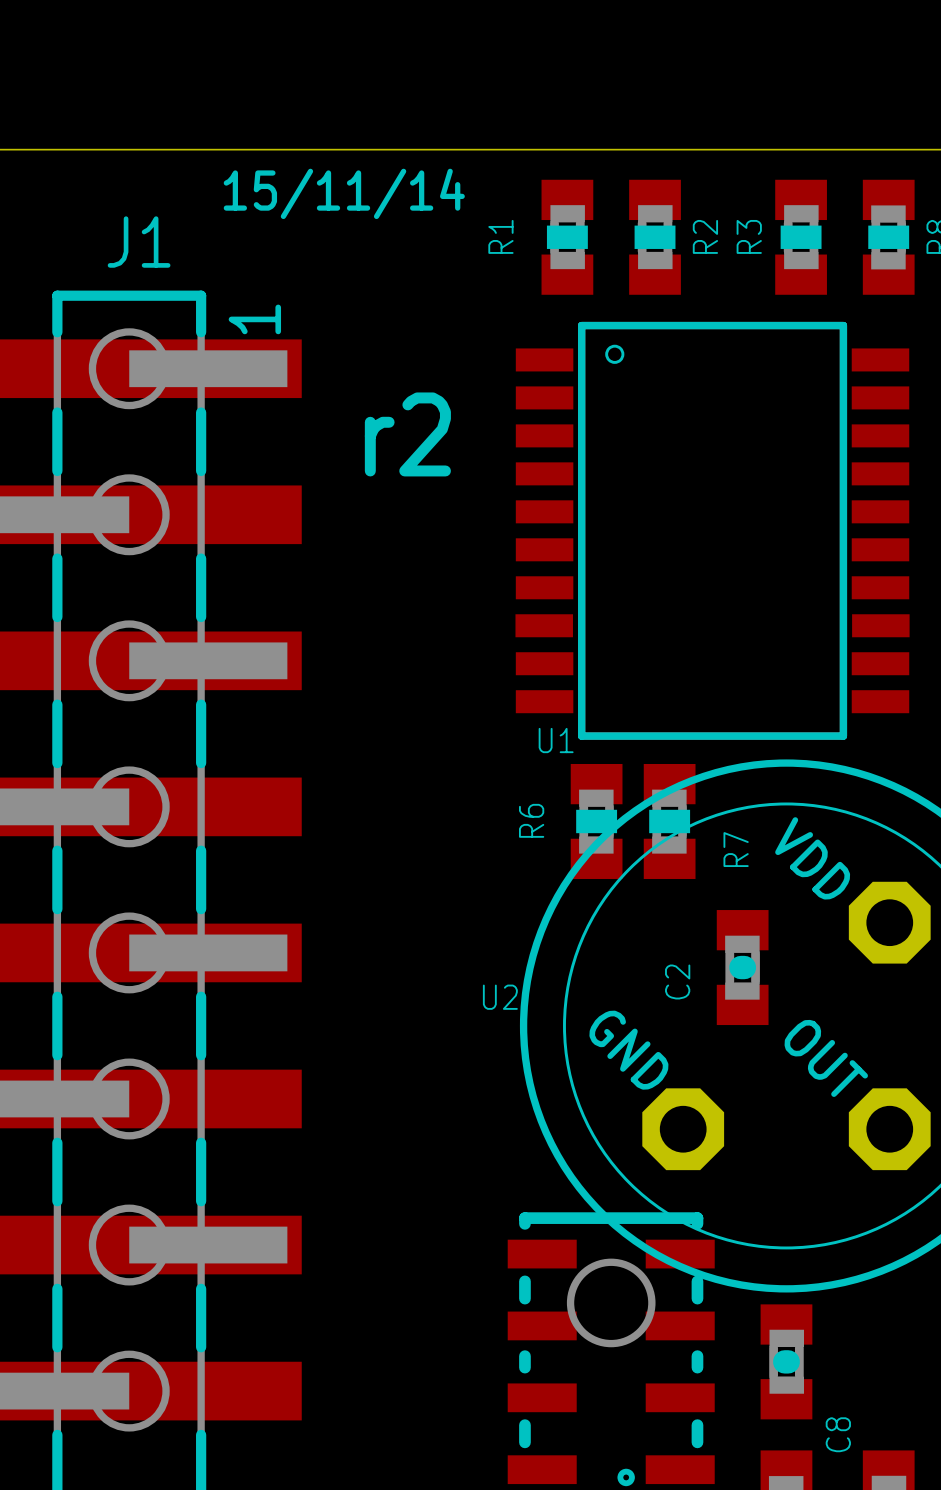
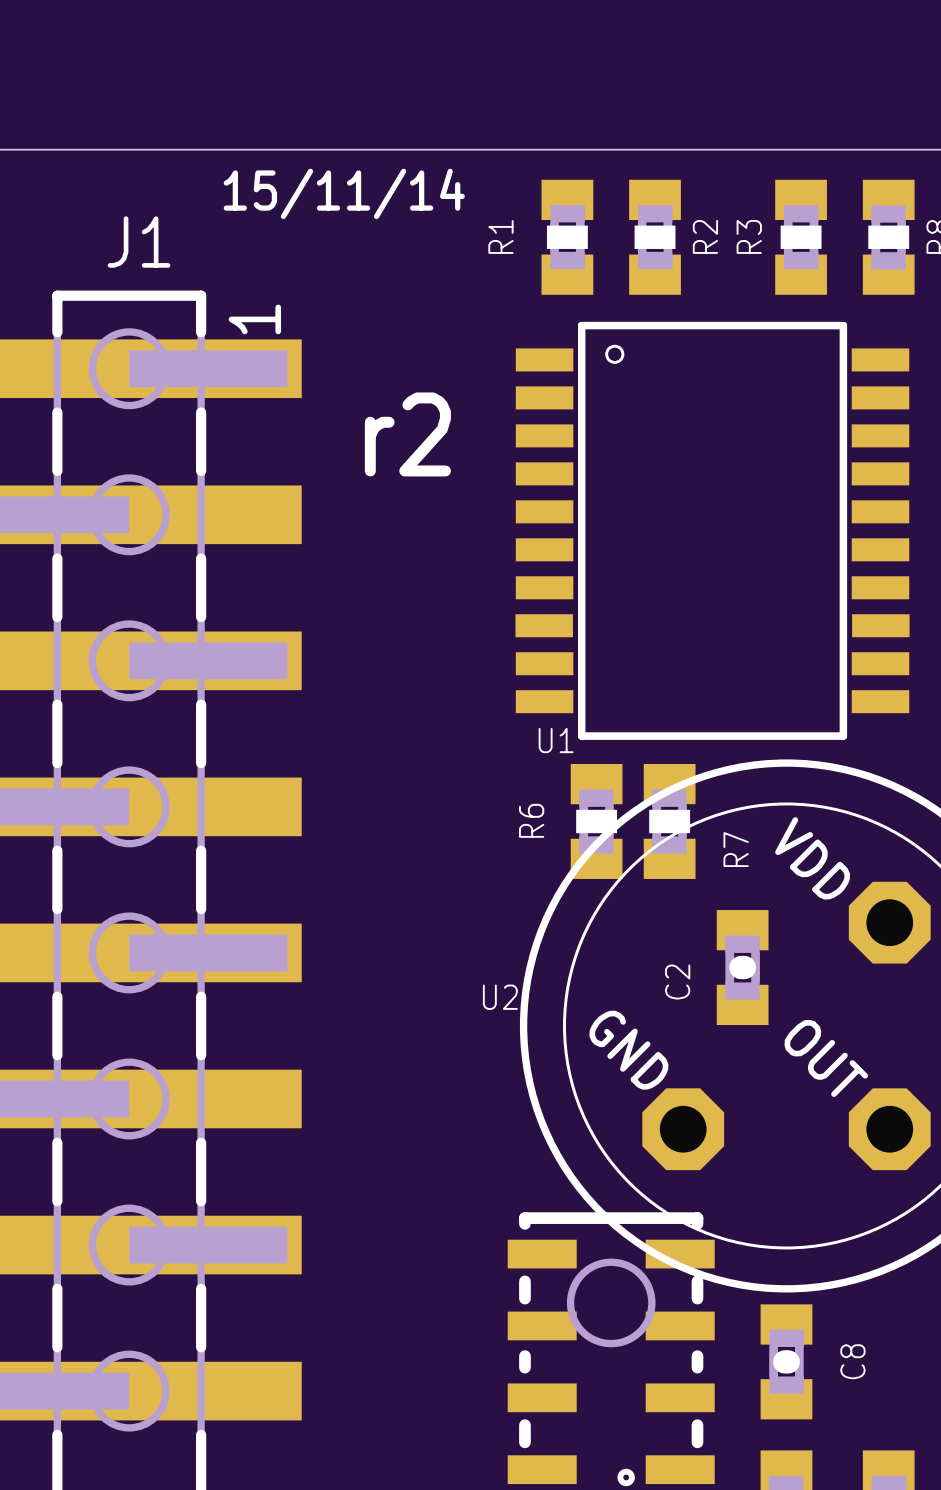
C8 name position: C8 (838, 1434) -> C8 (852, 1361)

